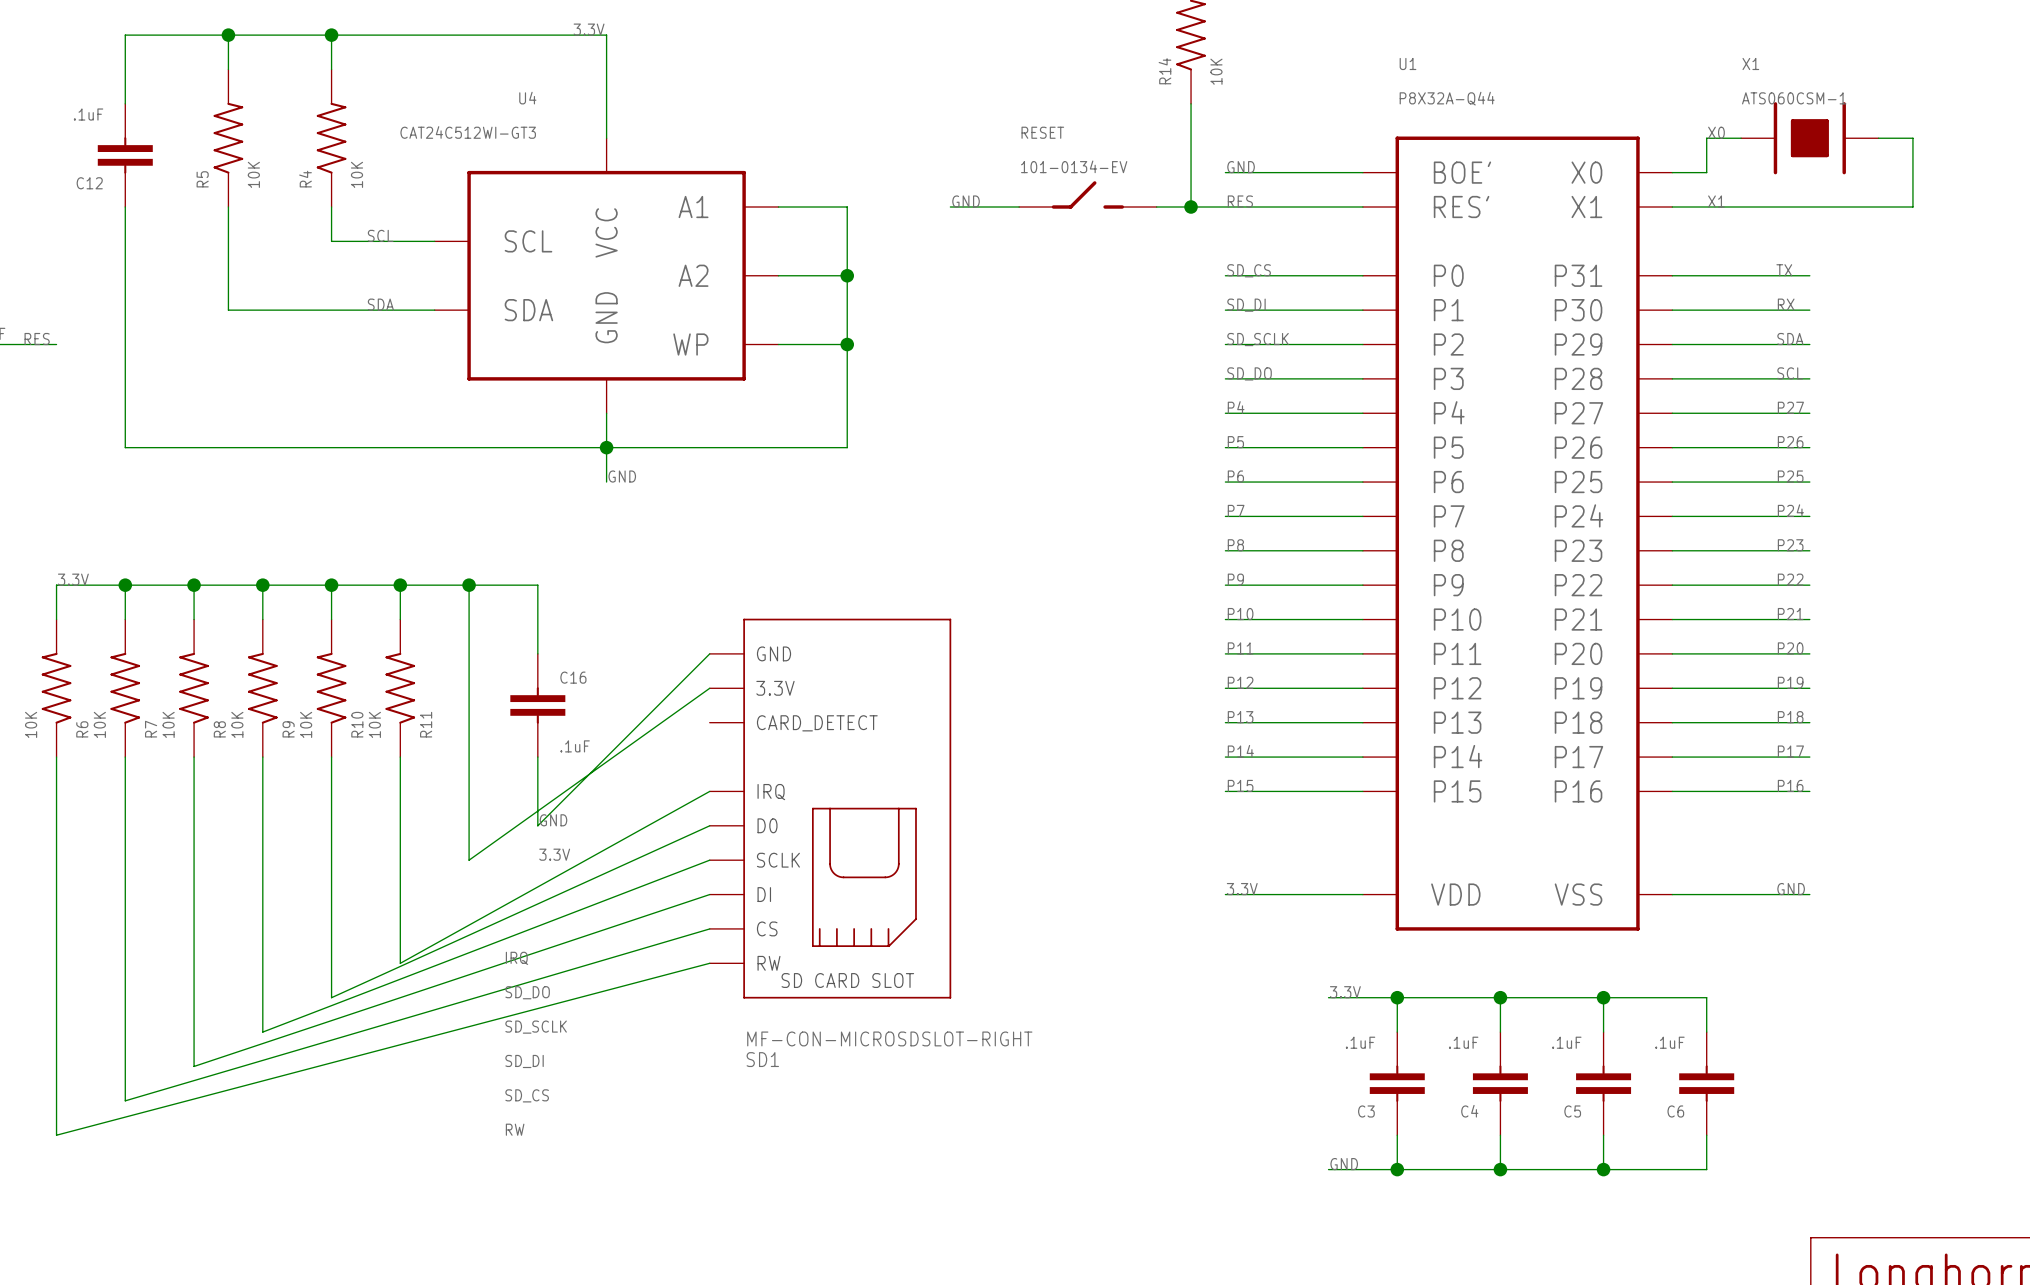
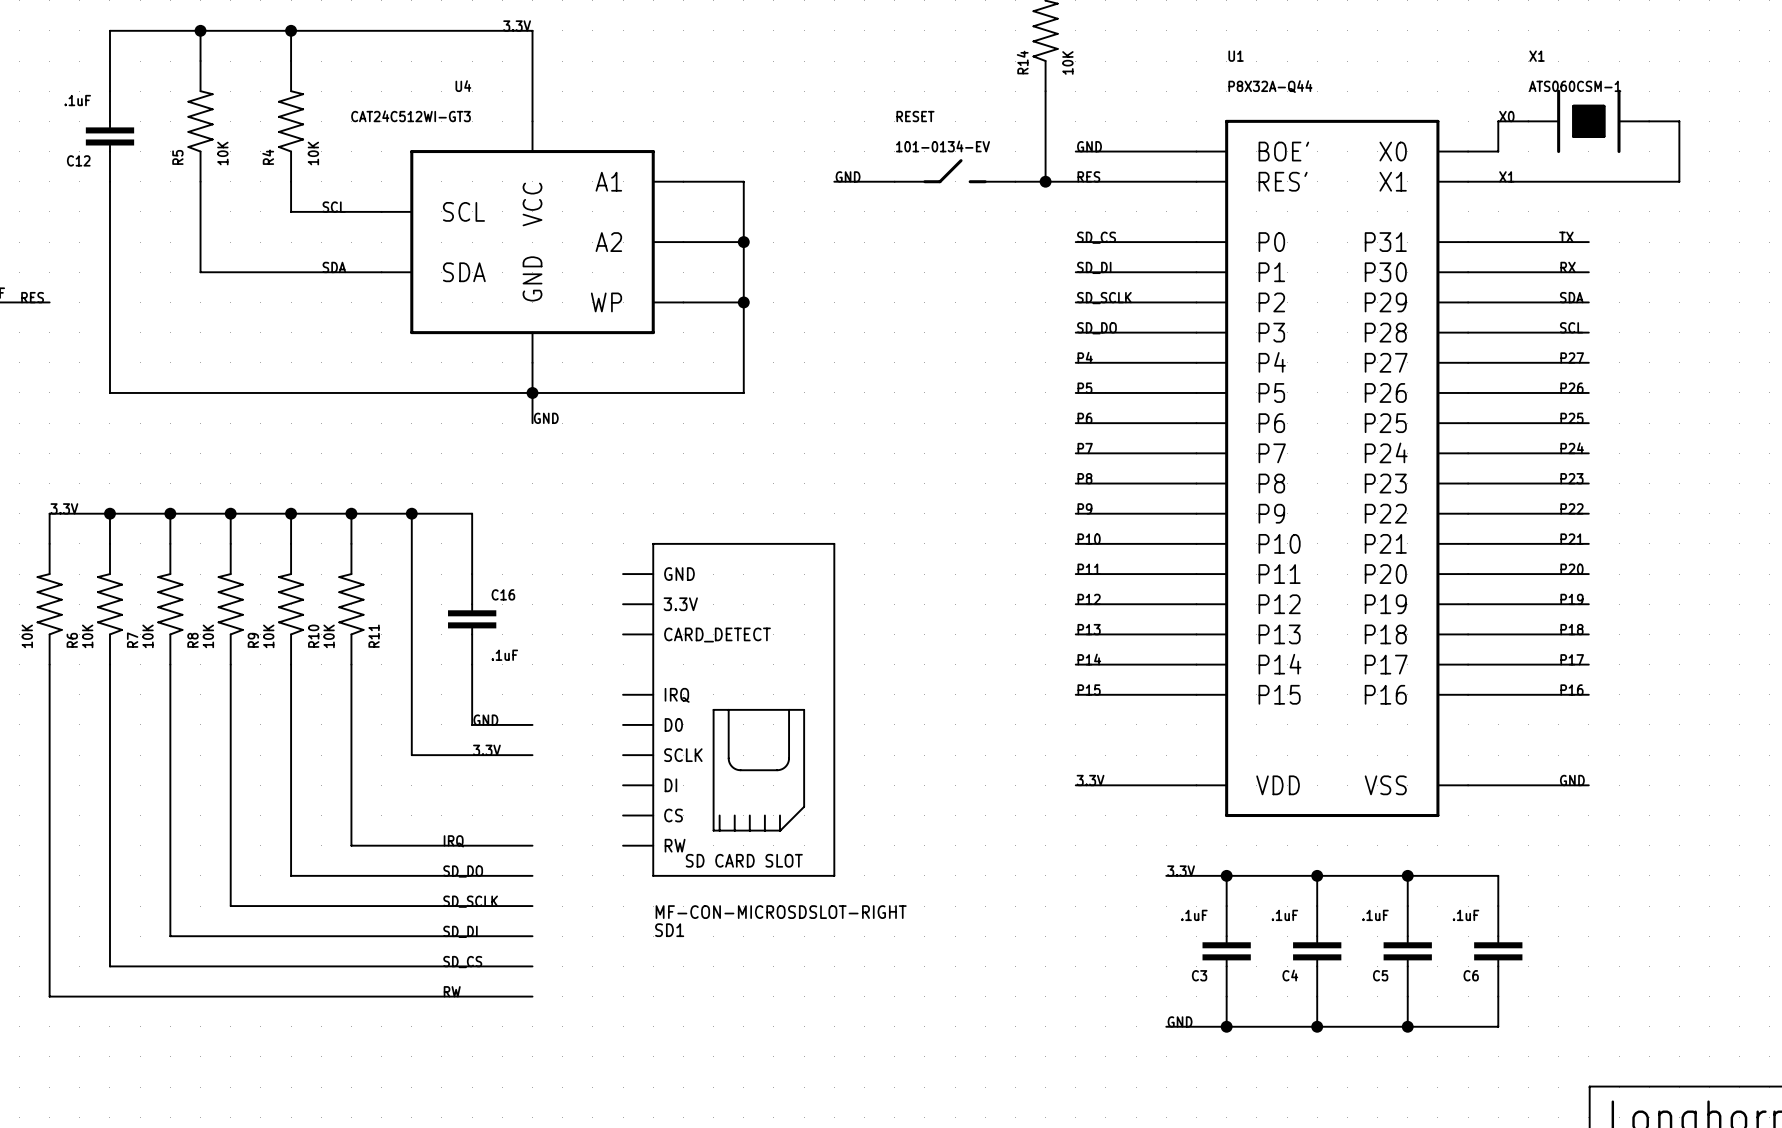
wire: (709, 653) (537, 825) -> (532, 724) (472, 724)
wire: (709, 688) (469, 860) -> (532, 755) (411, 755)
wire: (709, 791) (400, 963) -> (532, 845) (351, 845)
wire: (709, 825) (331, 997) -> (532, 875) (291, 875)
wire: (709, 860) (262, 1032) -> (532, 906) (230, 906)
wire: (709, 894) (194, 1066) -> (532, 936) (170, 936)
wire: (709, 928) (125, 1100) -> (532, 966) (109, 966)
wire: (709, 963) (56, 1135) -> (532, 996) (49, 996)

